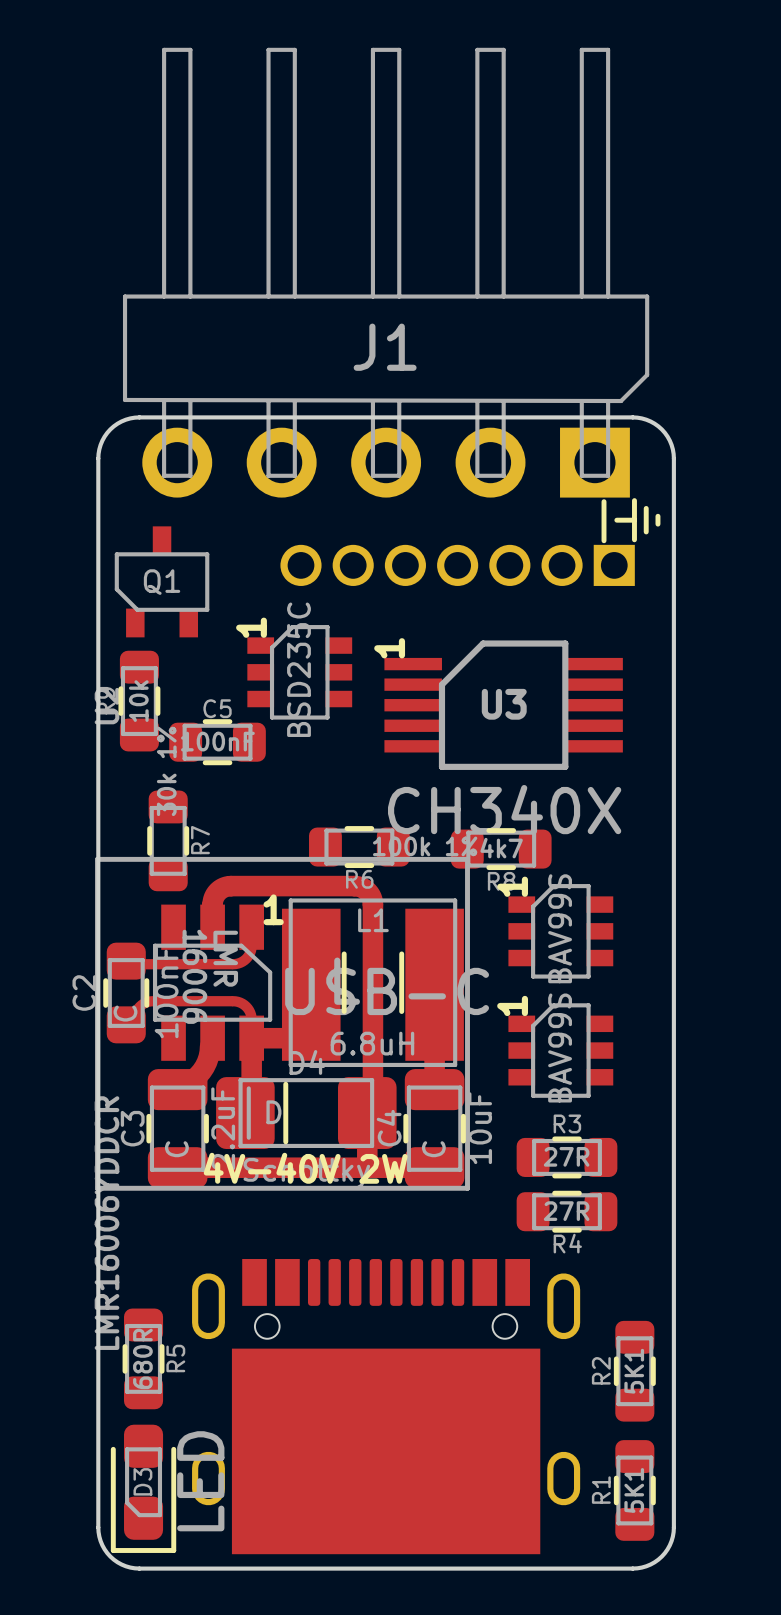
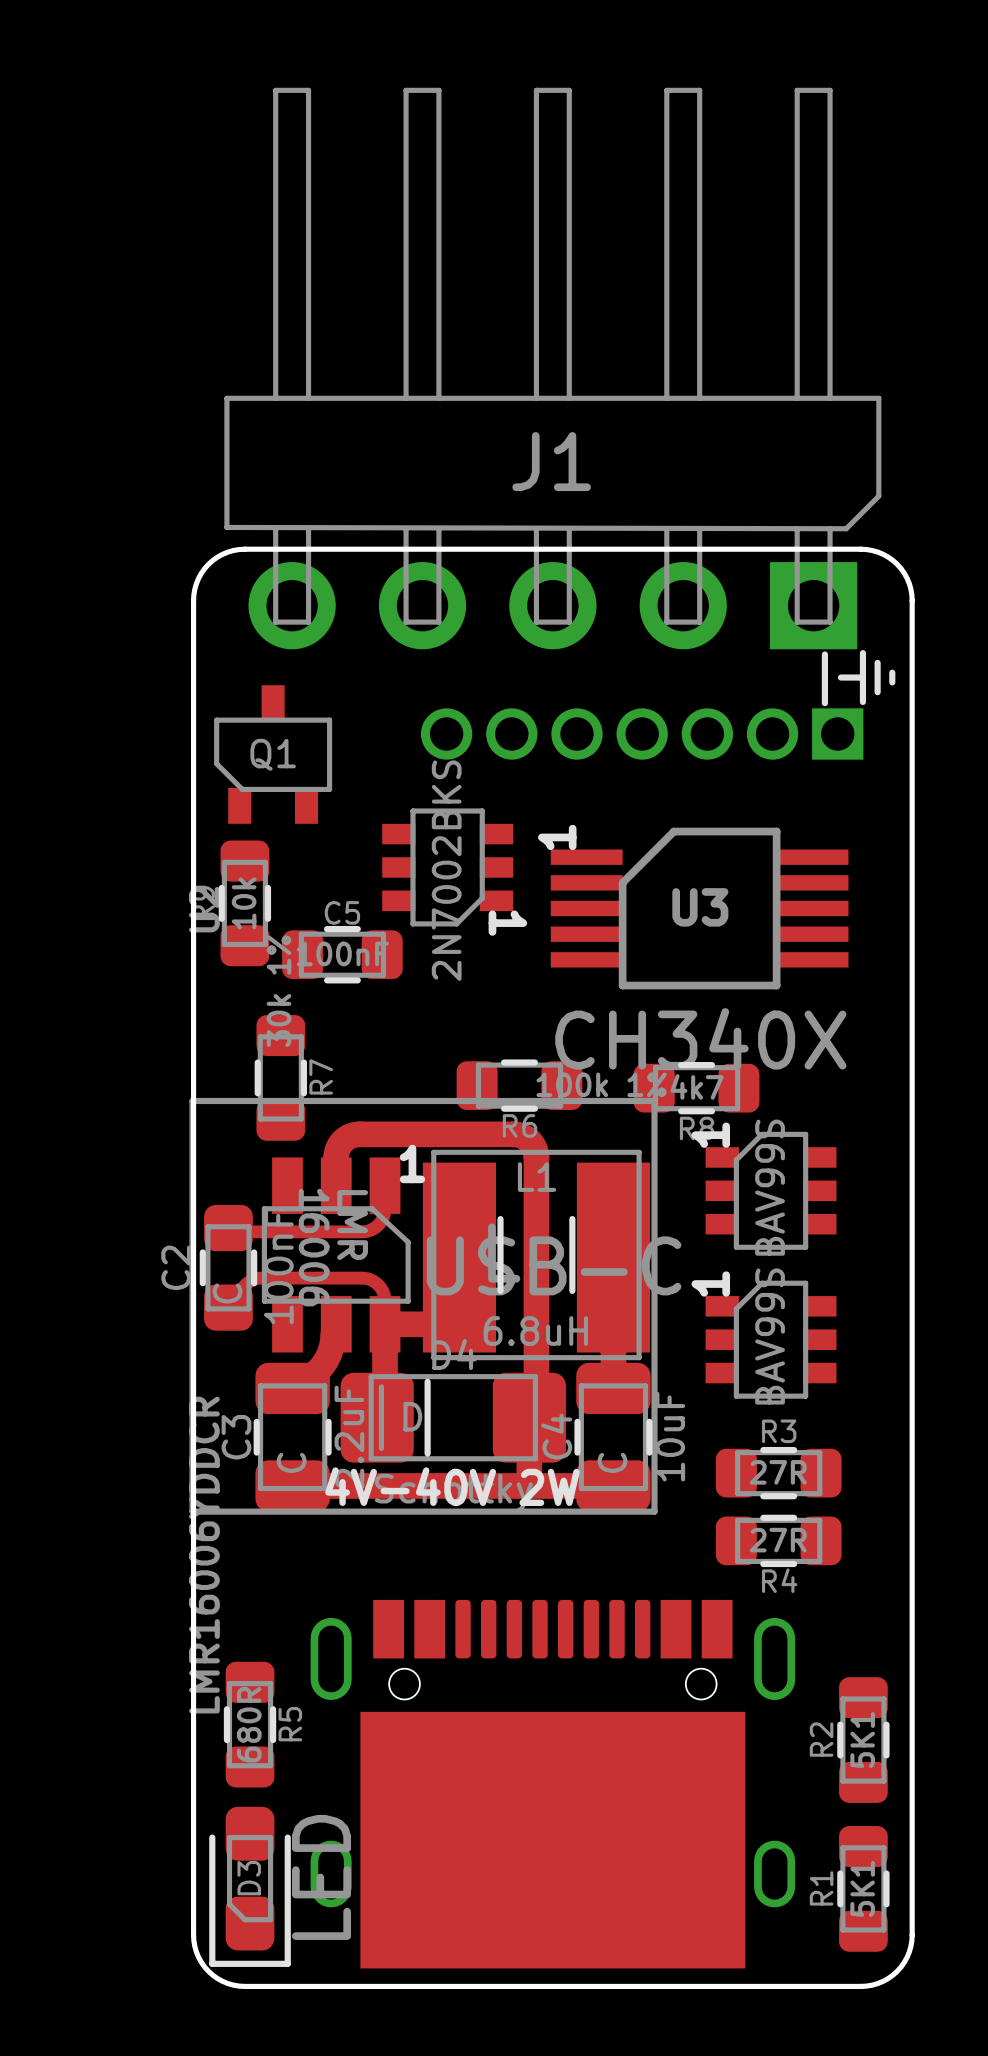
part value: BSD235C (298, 669) -> 2N7002BKS (446, 870)
part rotation: 0° (299, 672) -> 180° (447, 867)

